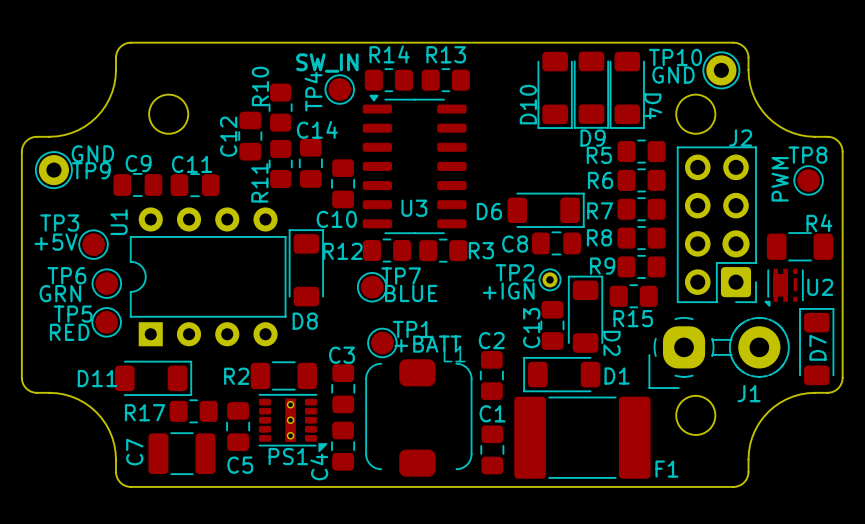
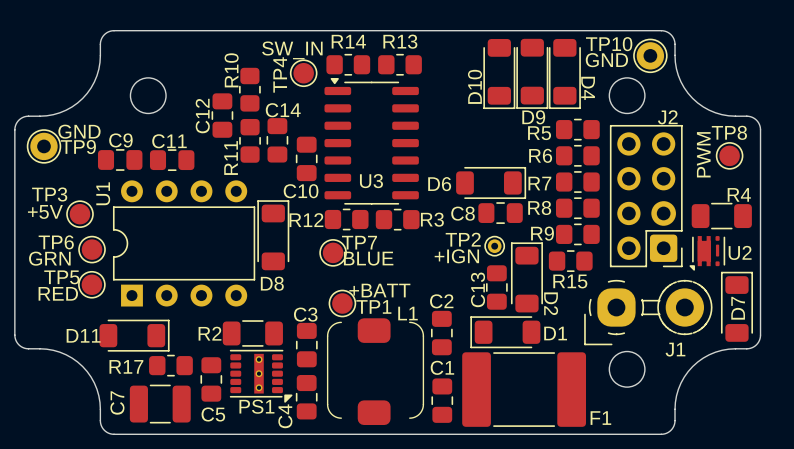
TP1 name position: TP1 (412, 329) -> TP1 (373, 306)
TP1 value position: +BATT (427, 344) -> +BATT (379, 290)

